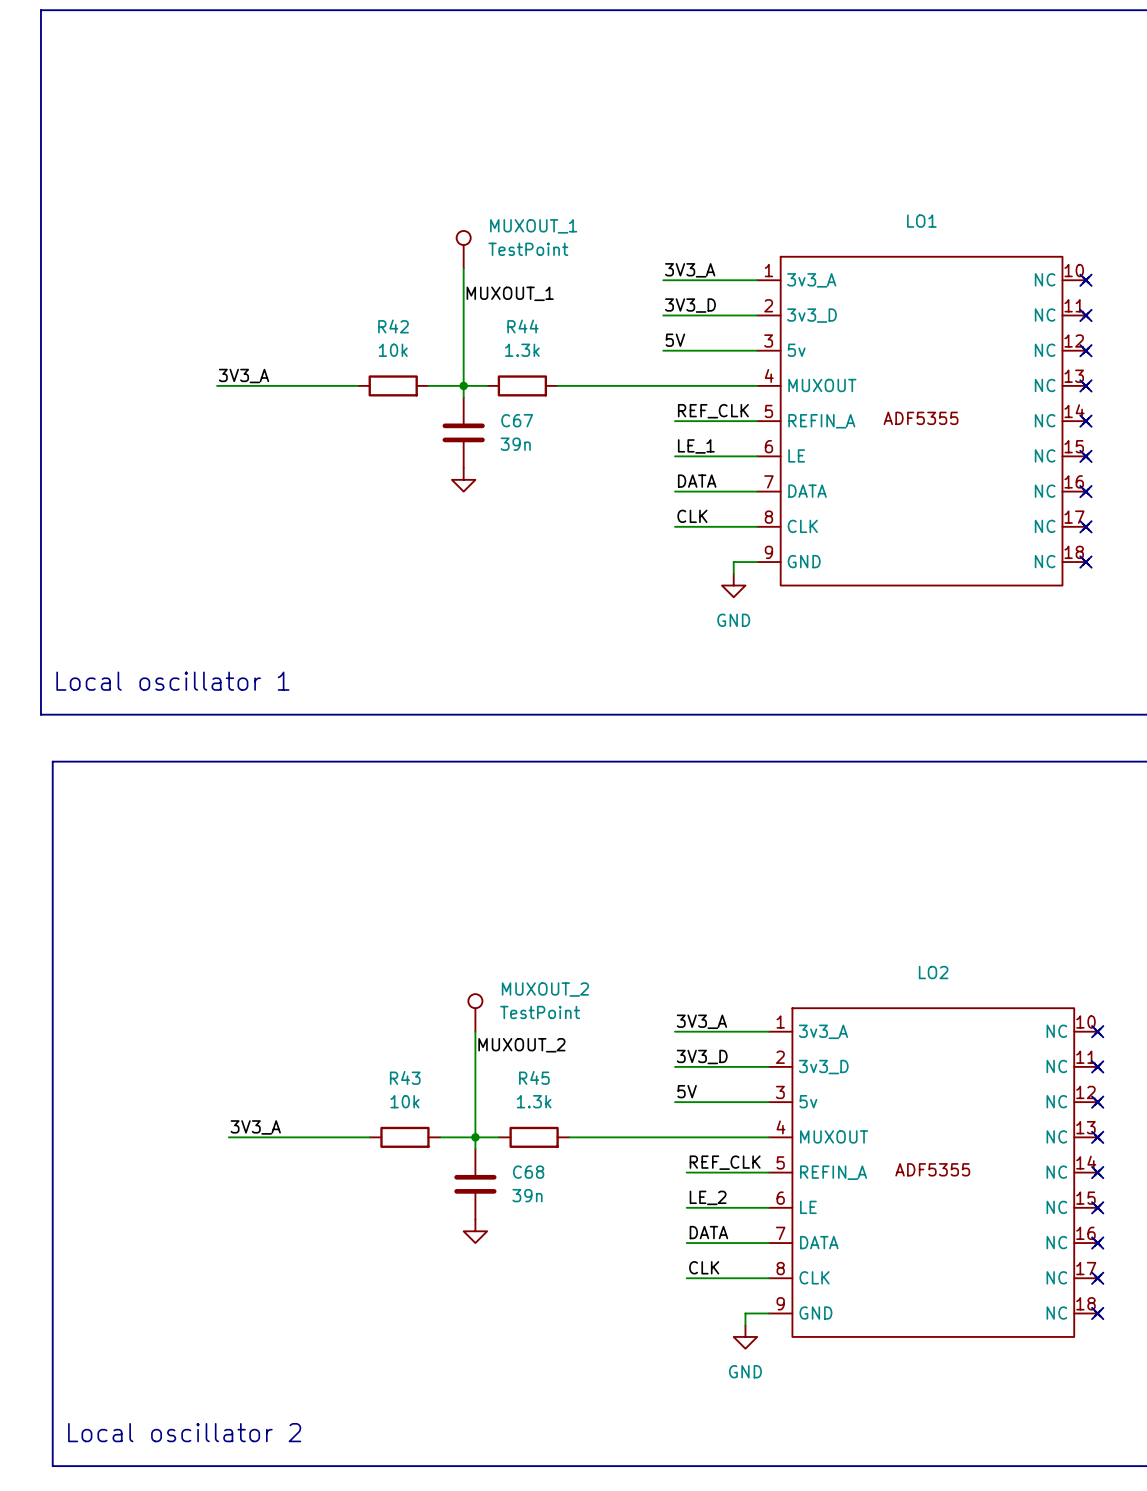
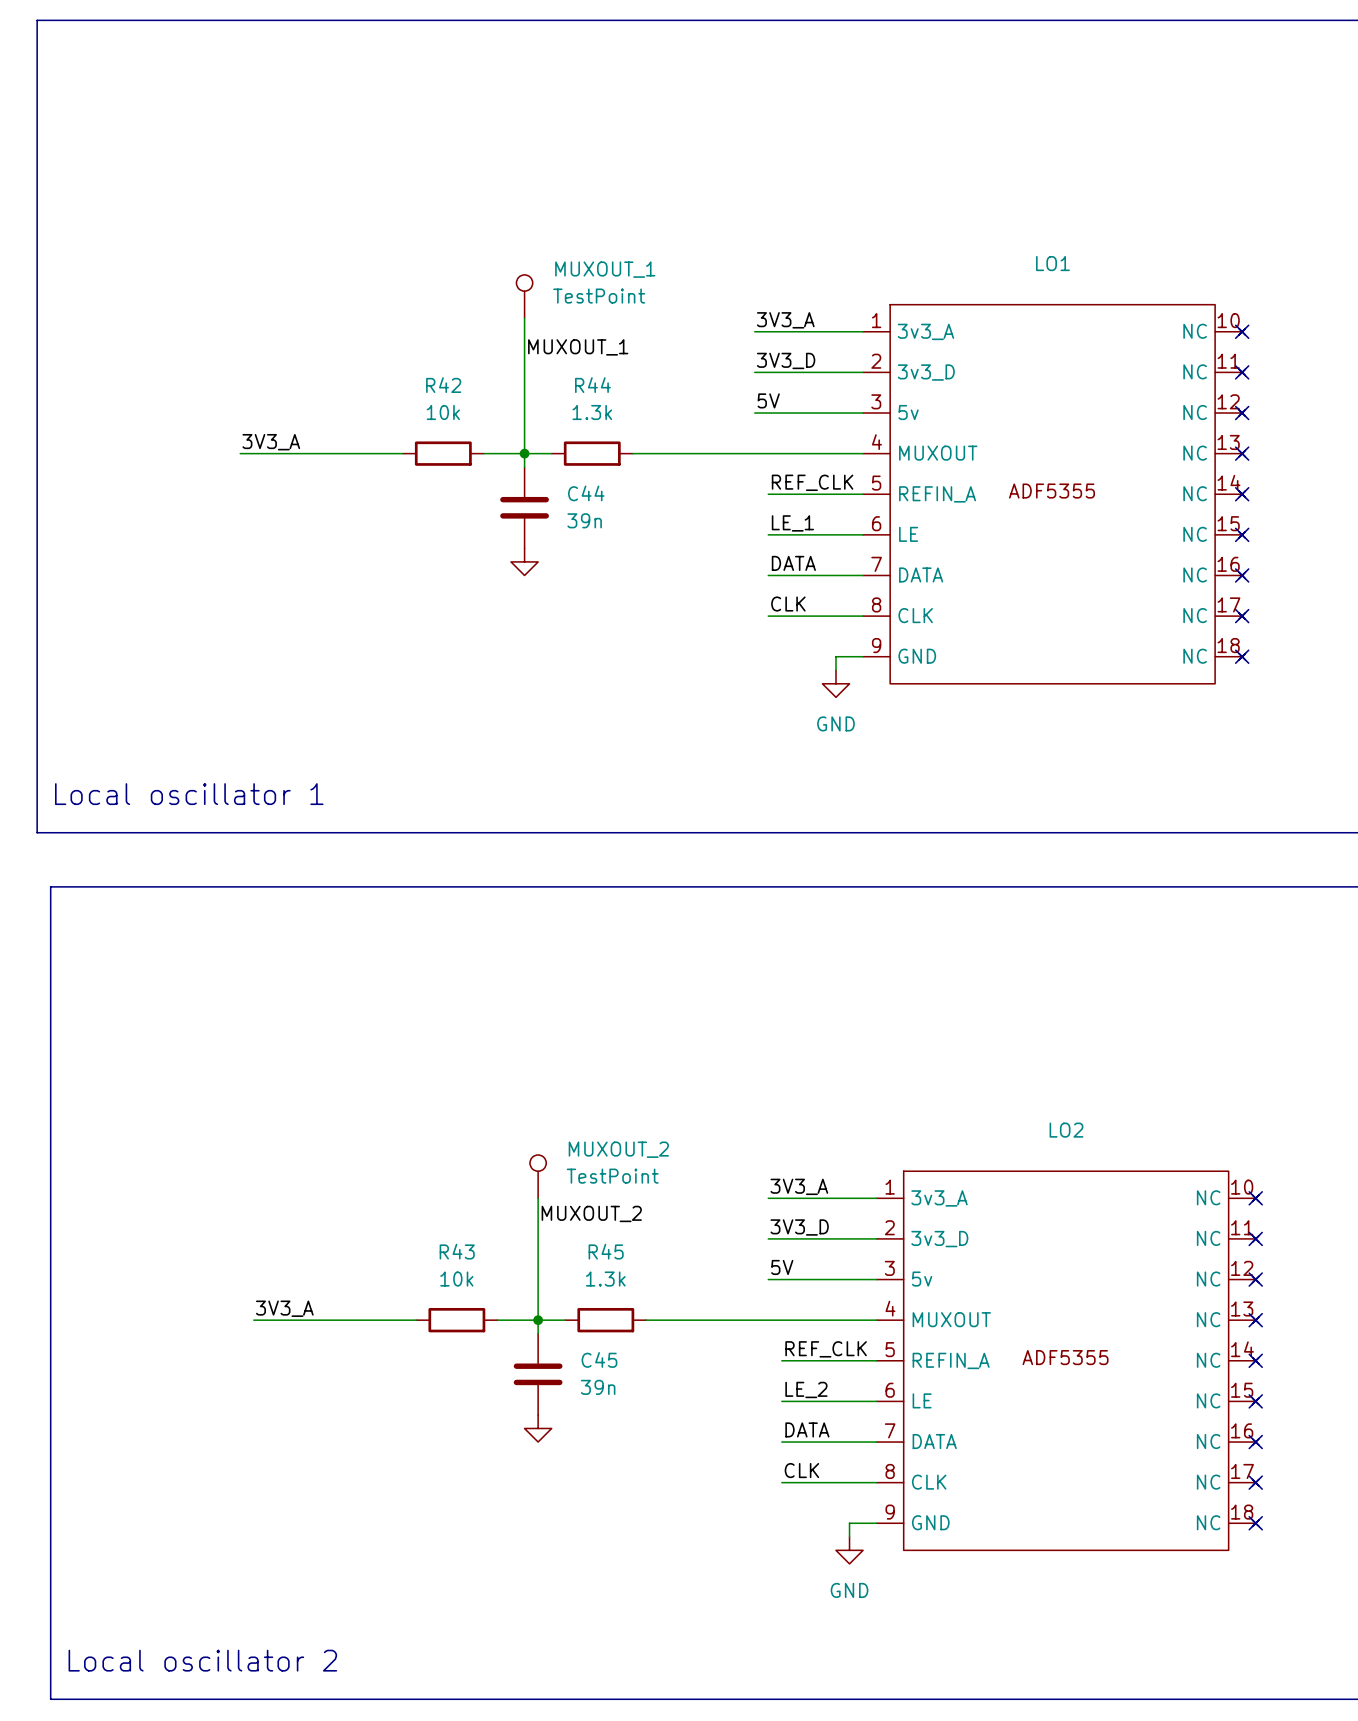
C67 name: C67 (517, 420) -> C44 (586, 493)
C68 name: C68 (528, 1172) -> C45 (599, 1359)

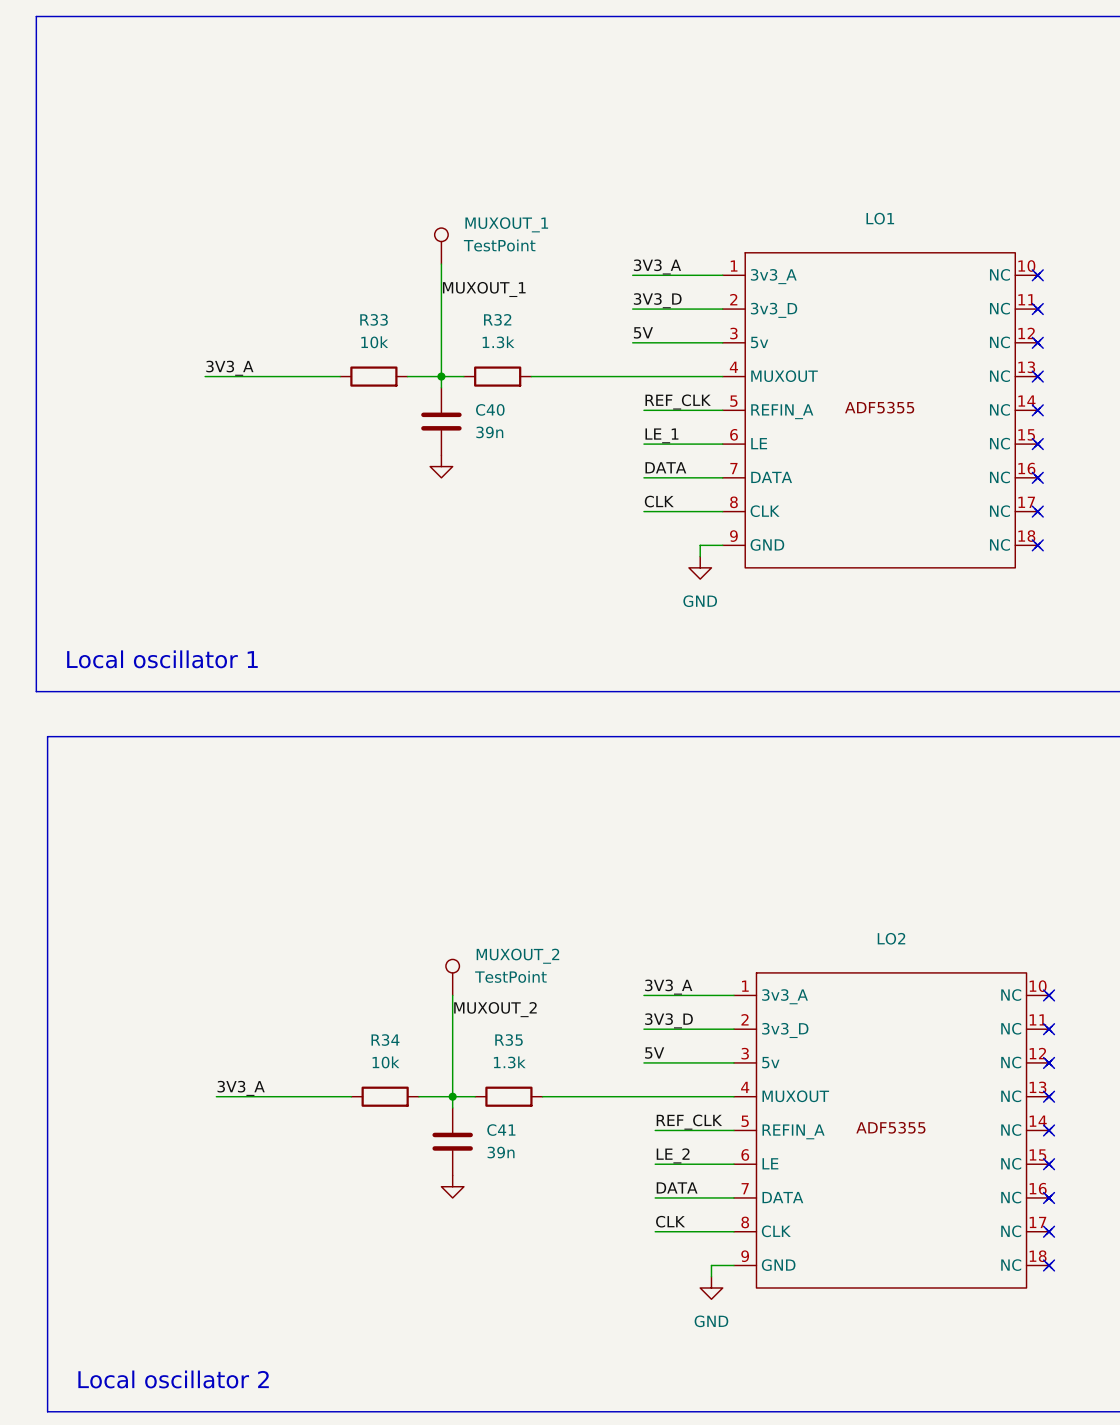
R42 name: R42 (443, 385) -> R33 (374, 319)
R44 name: R44 (592, 385) -> R32 (497, 319)
C44 name: C44 (586, 493) -> C40 (490, 409)
R43 name: R43 (457, 1251) -> R34 (385, 1040)
R45 name: R45 (606, 1251) -> R35 (509, 1040)
C45 name: C45 (599, 1359) -> C41 (501, 1130)

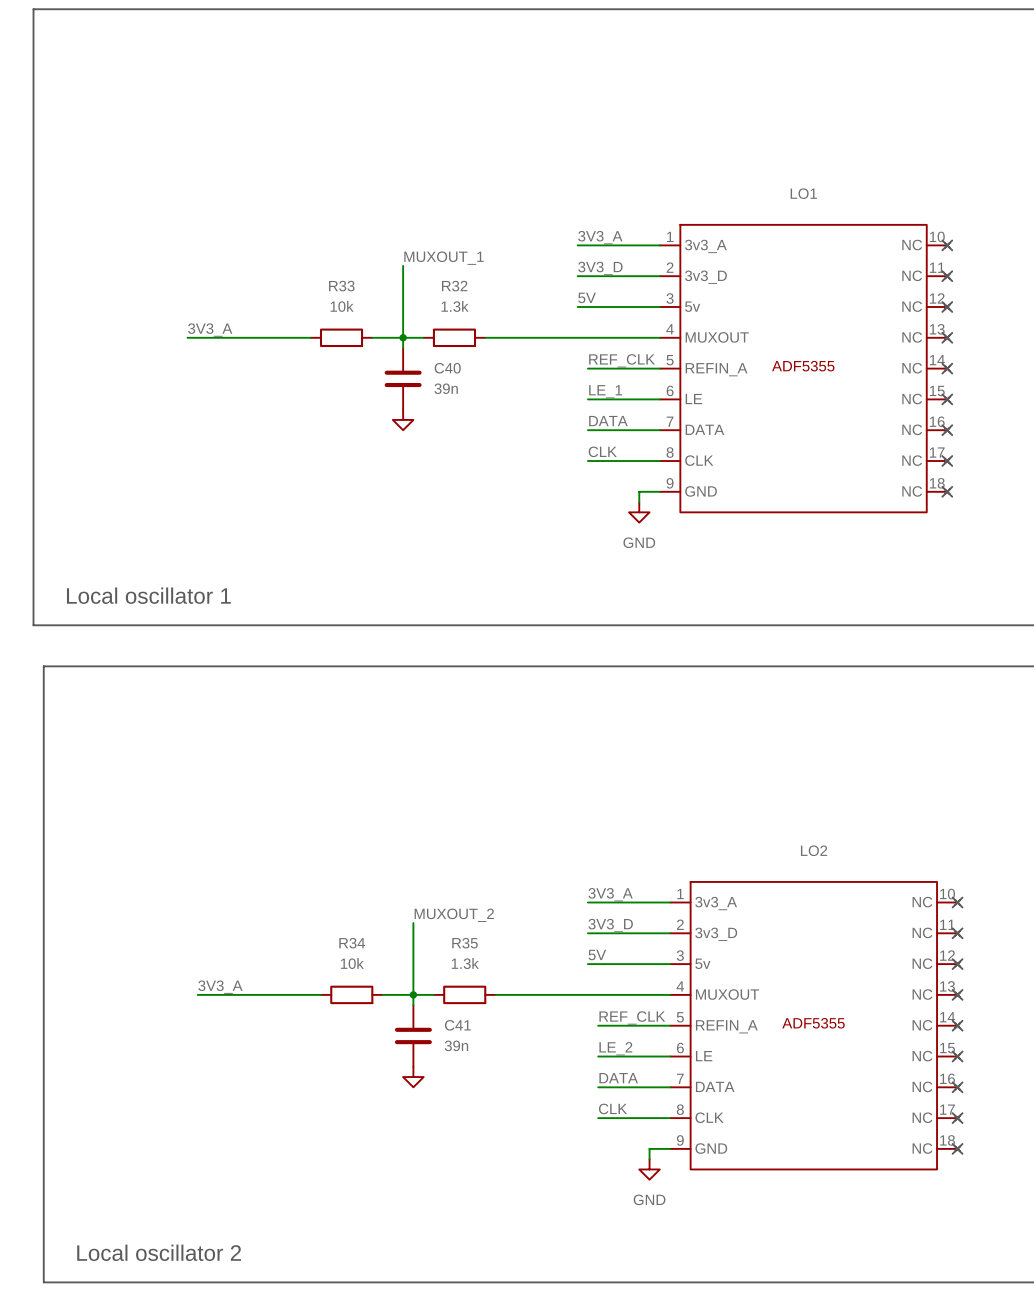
MUXOUT_1: TestPoint (441, 246) -> none
wire: (441, 264) (441, 297) -> none
MUXOUT_2: TestPoint (452, 977) -> none
wire: (452, 995) (452, 1017) -> none

